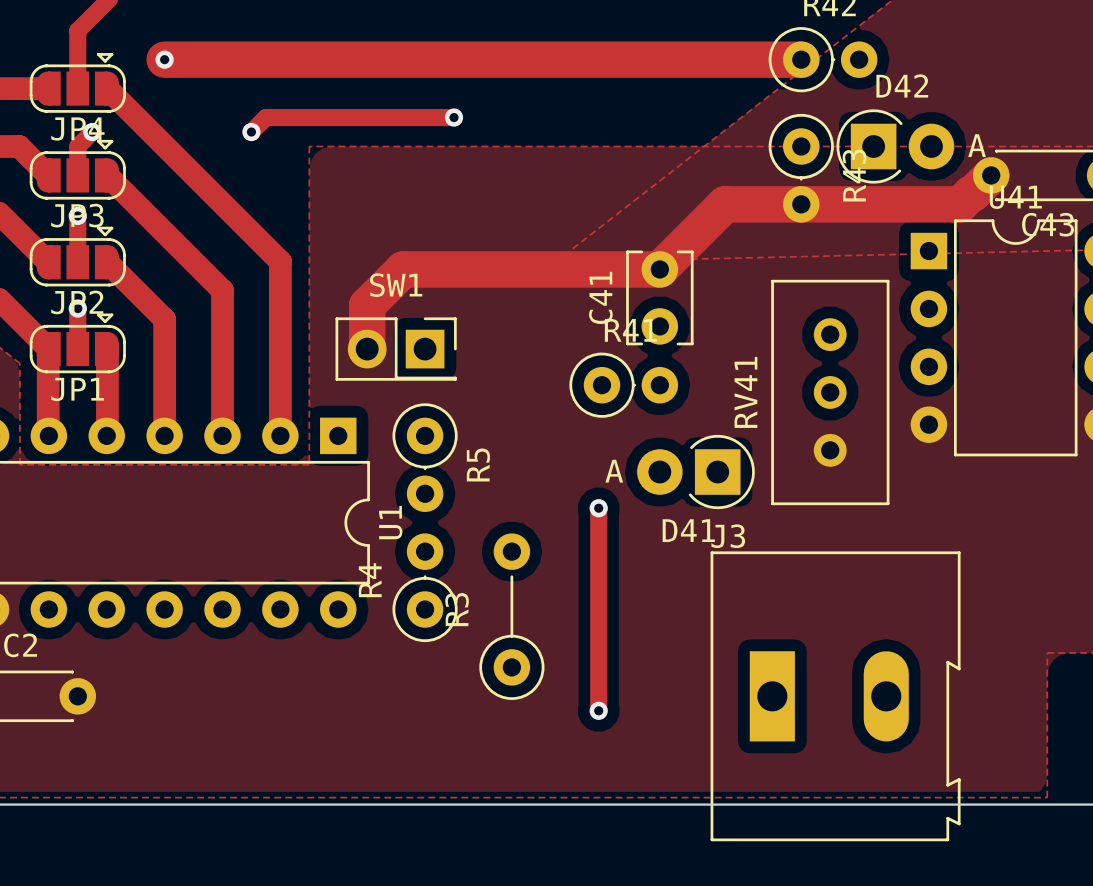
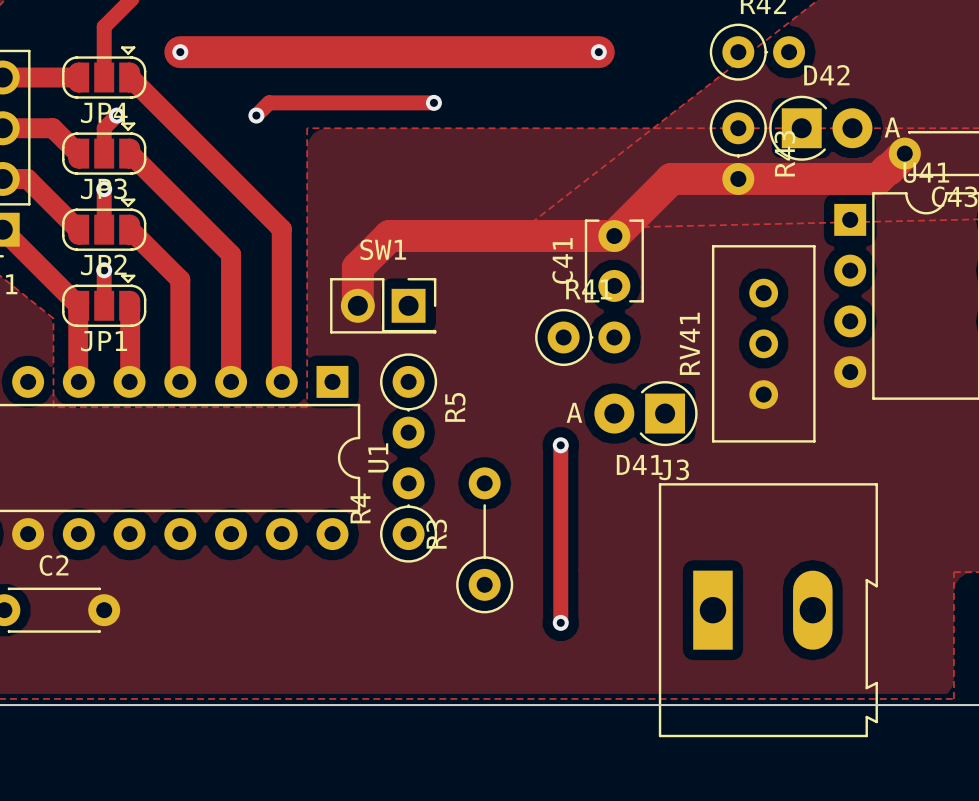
track: (642, 59) (801, 59) -> none
via: none -> (598, 52)

